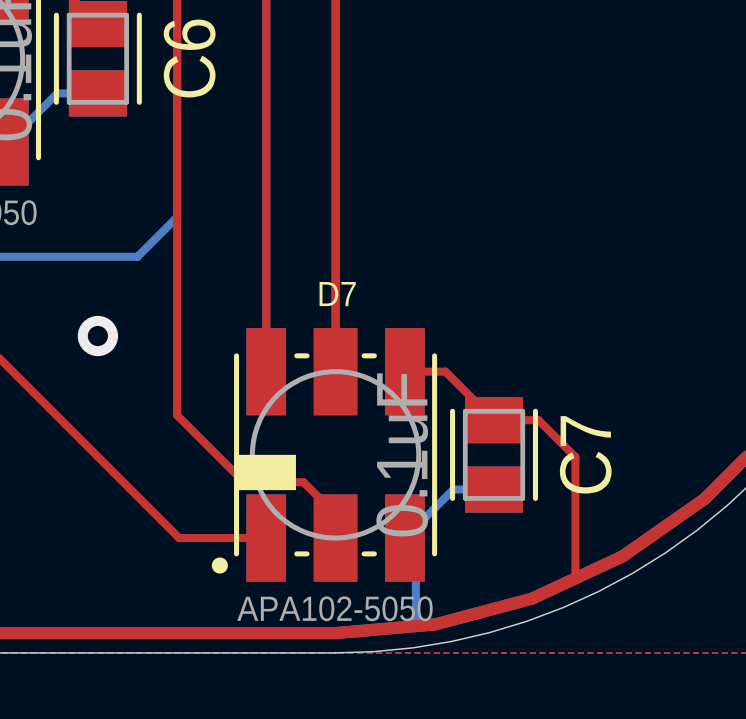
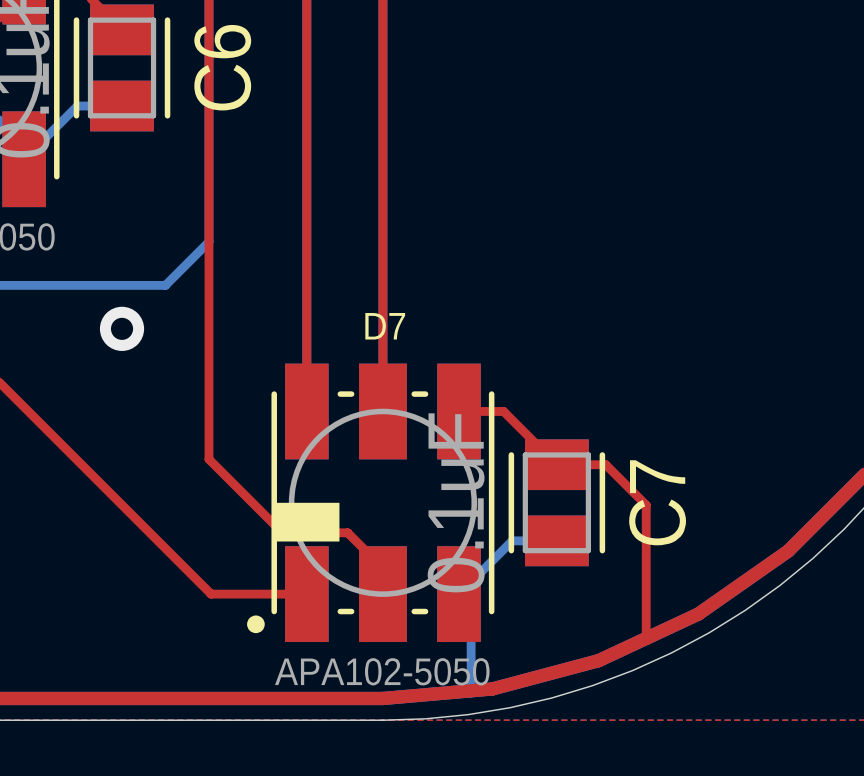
via position: (97, 336) -> (122, 328)

